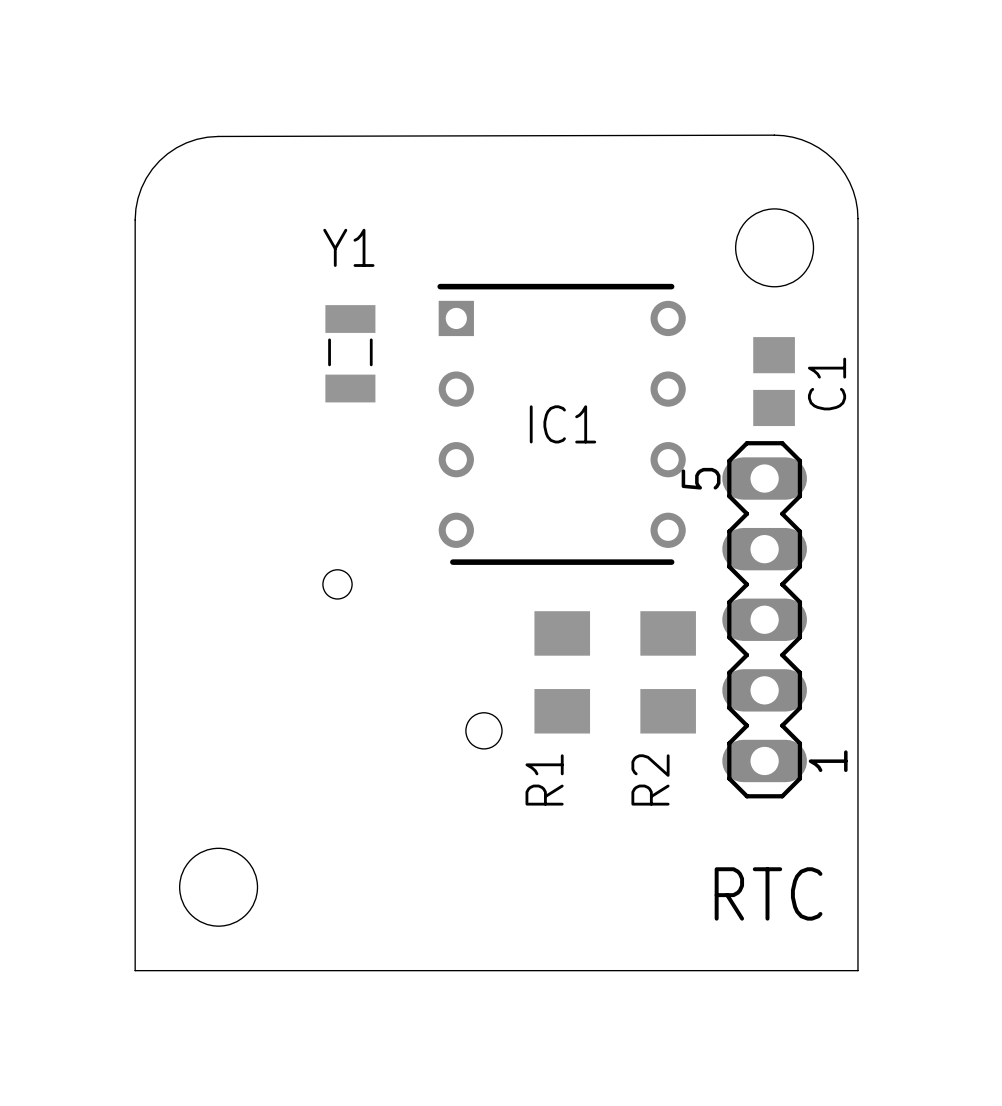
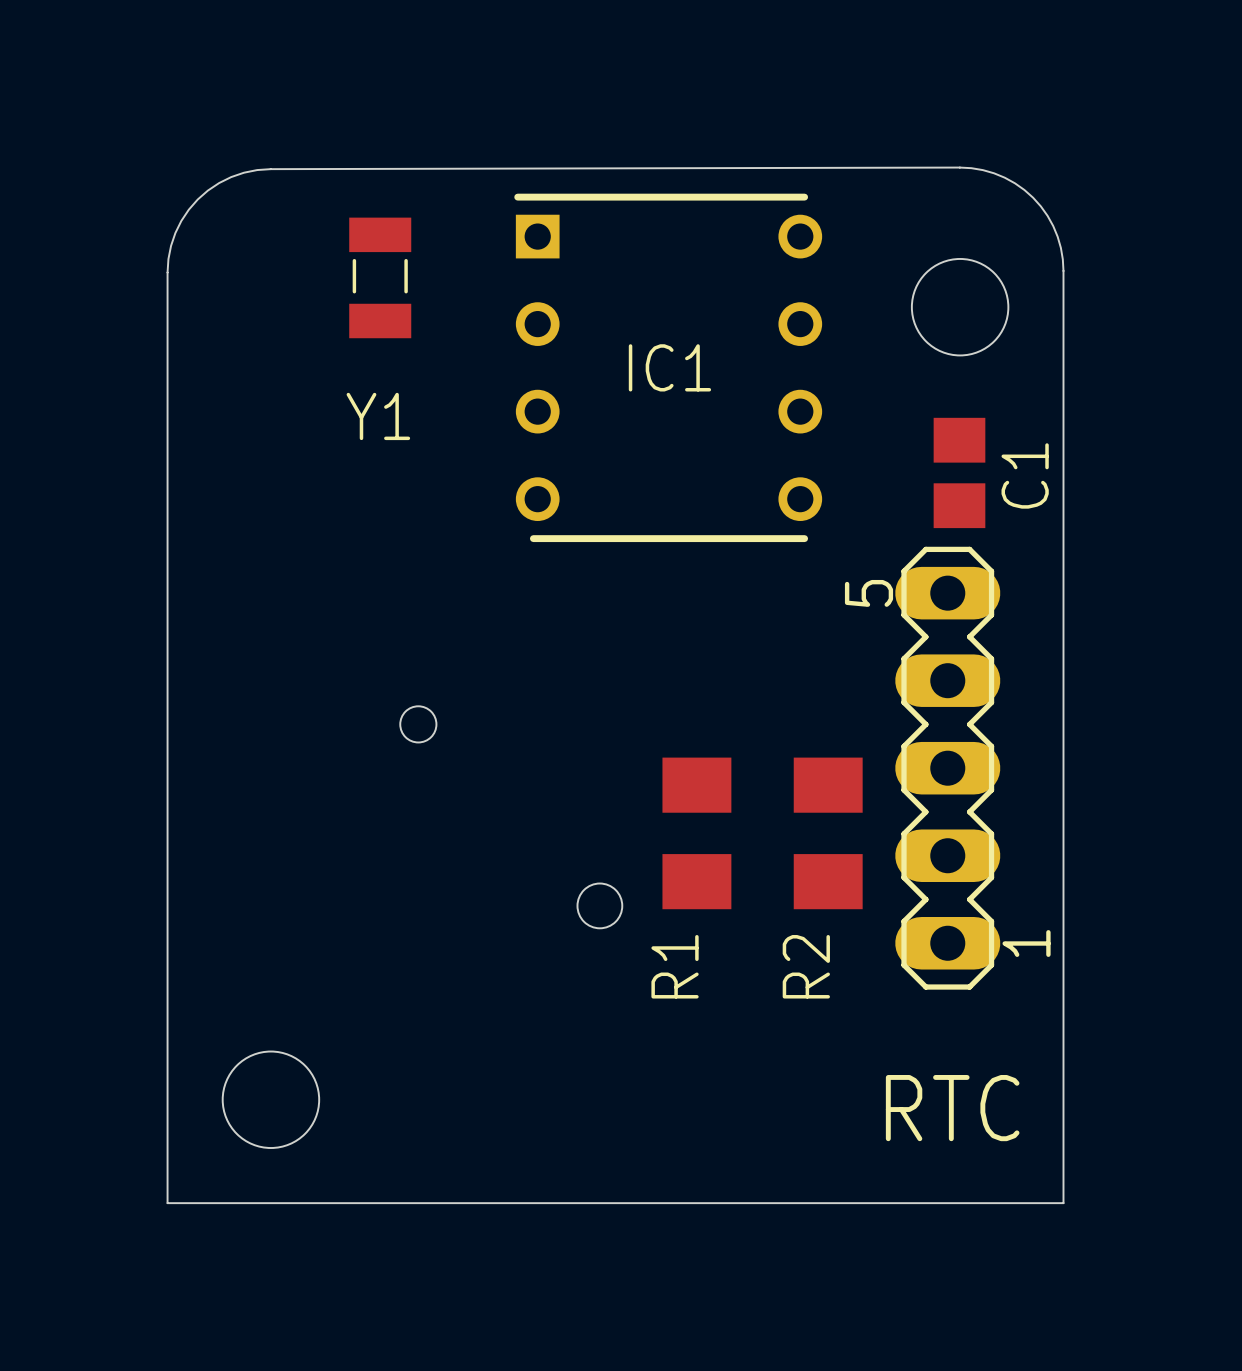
Y1 name position: Y1 (348, 247) -> Y1 (378, 416)
Y1 position: (350, 353) -> (380, 277)
IC1 position: (561, 424) -> (668, 367)

